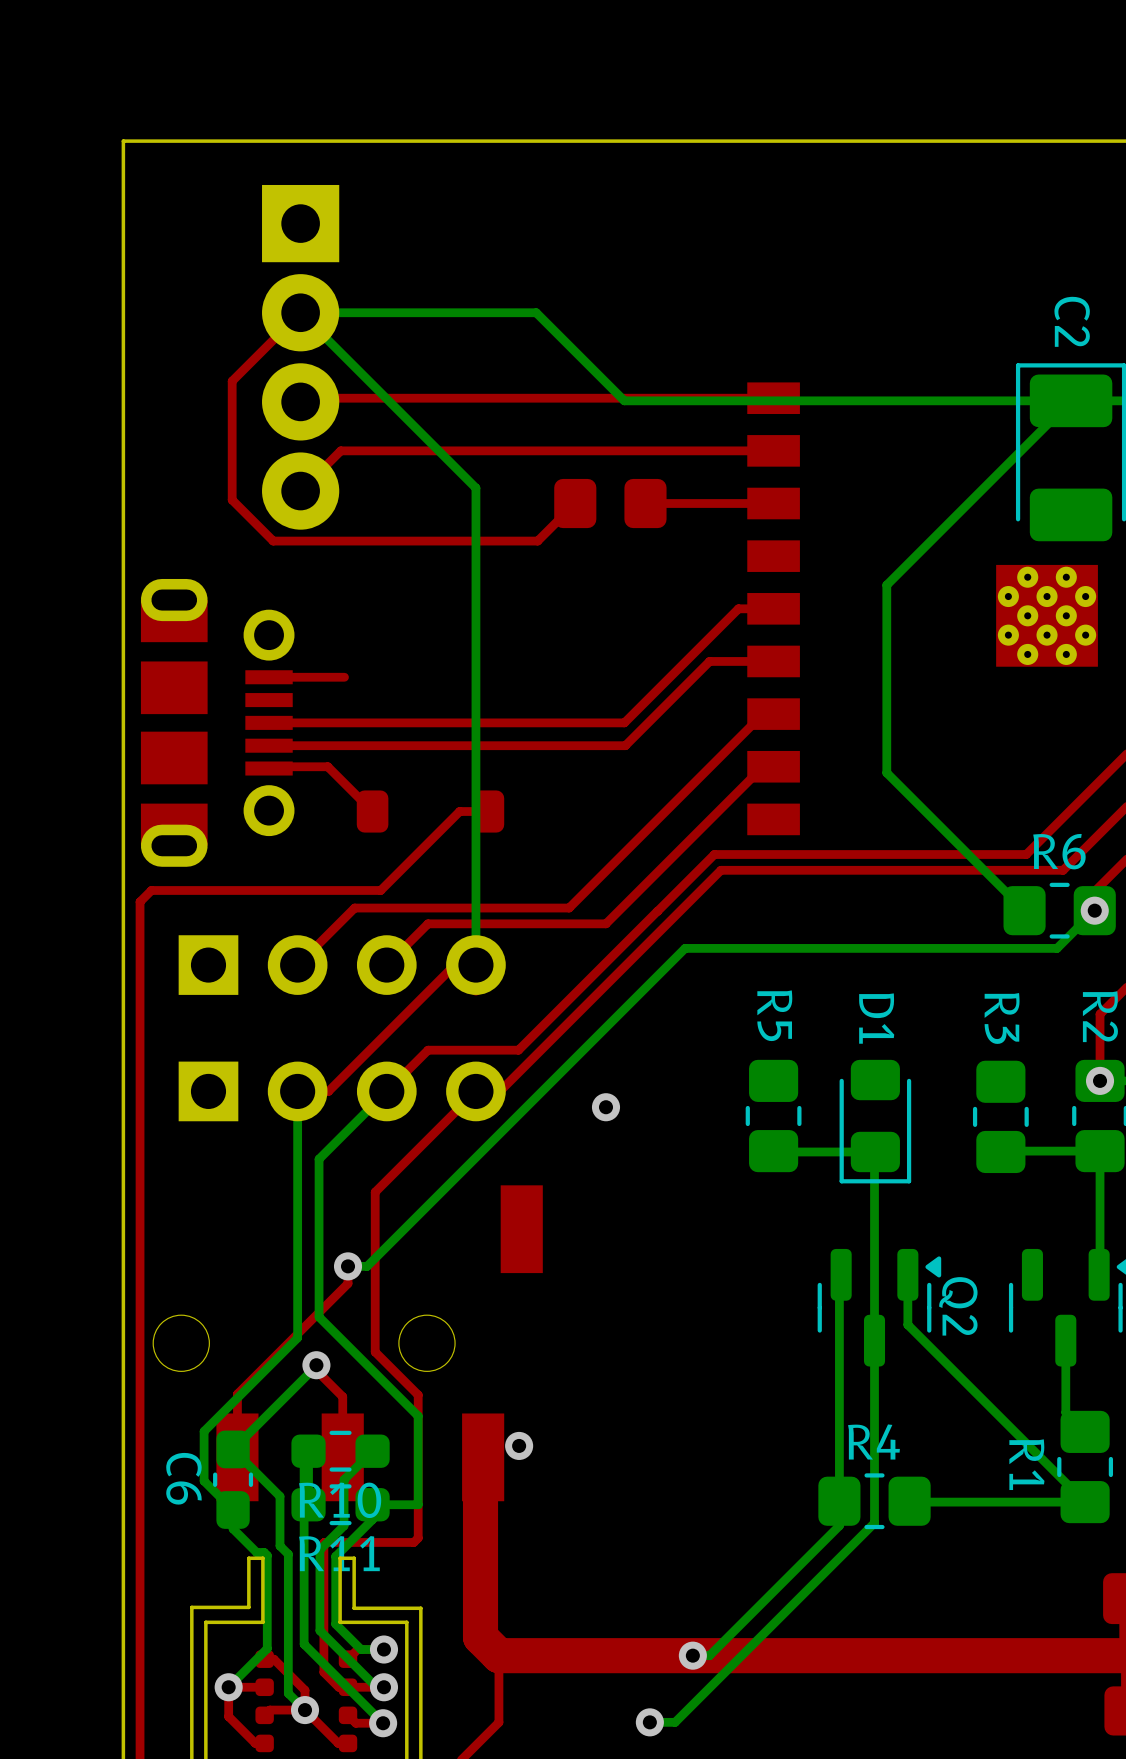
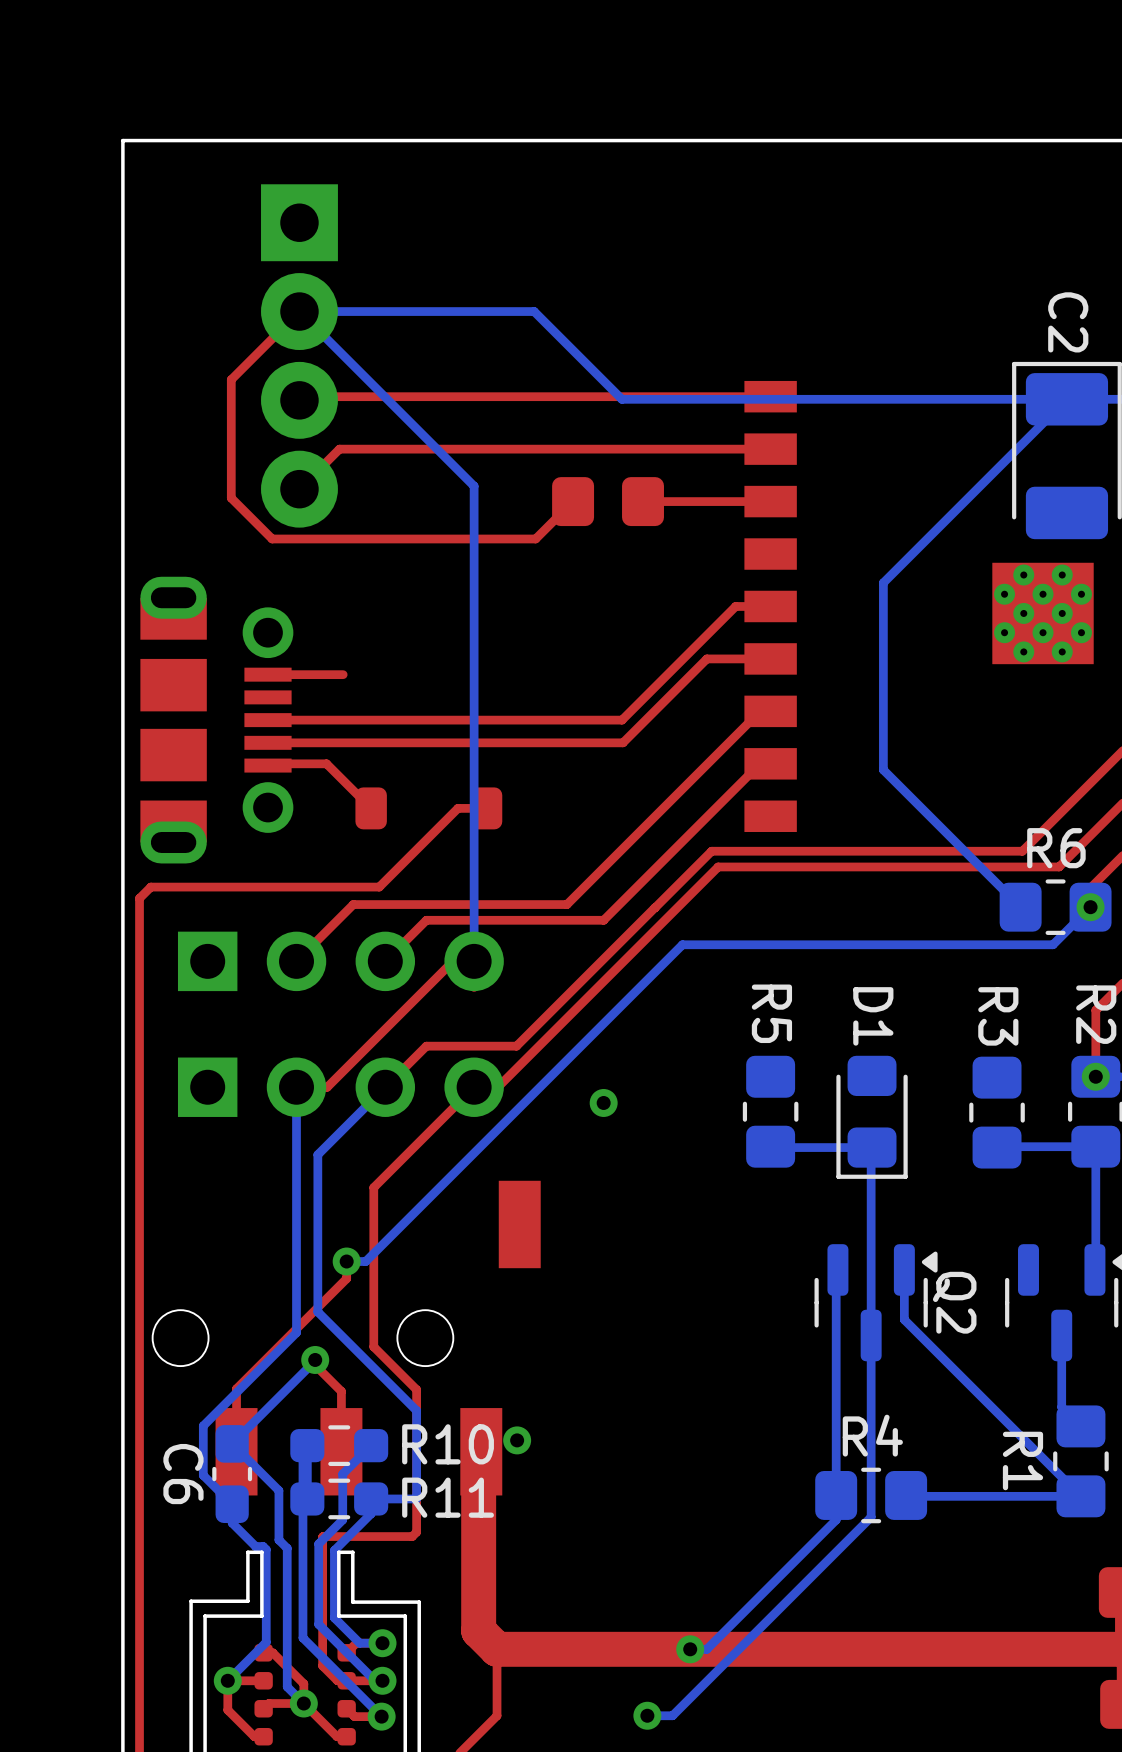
R10 name position: R10 (340, 1500) -> R10 (448, 1444)
R11 name position: R11 (339, 1553) -> R11 (448, 1497)

